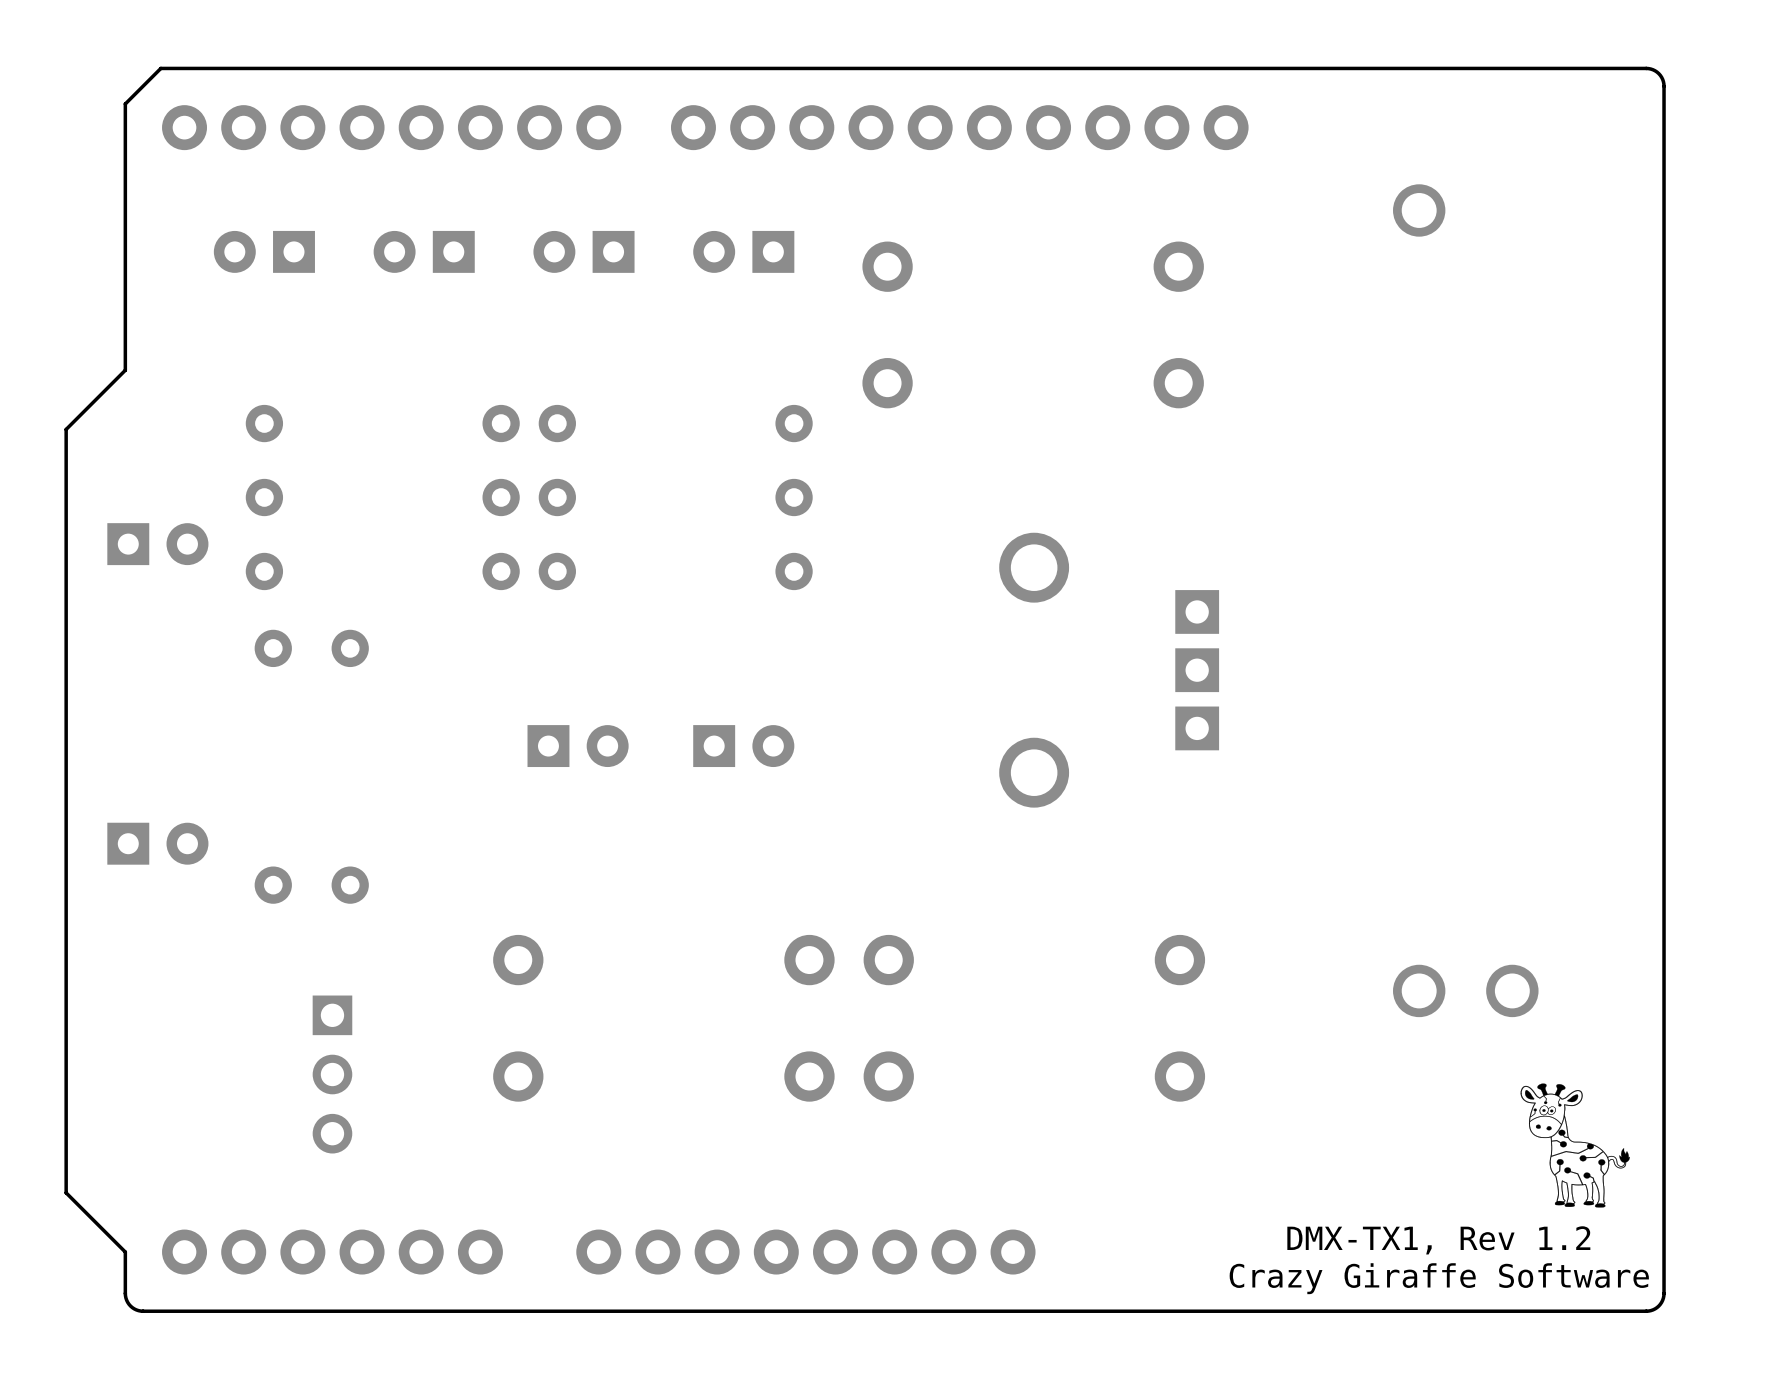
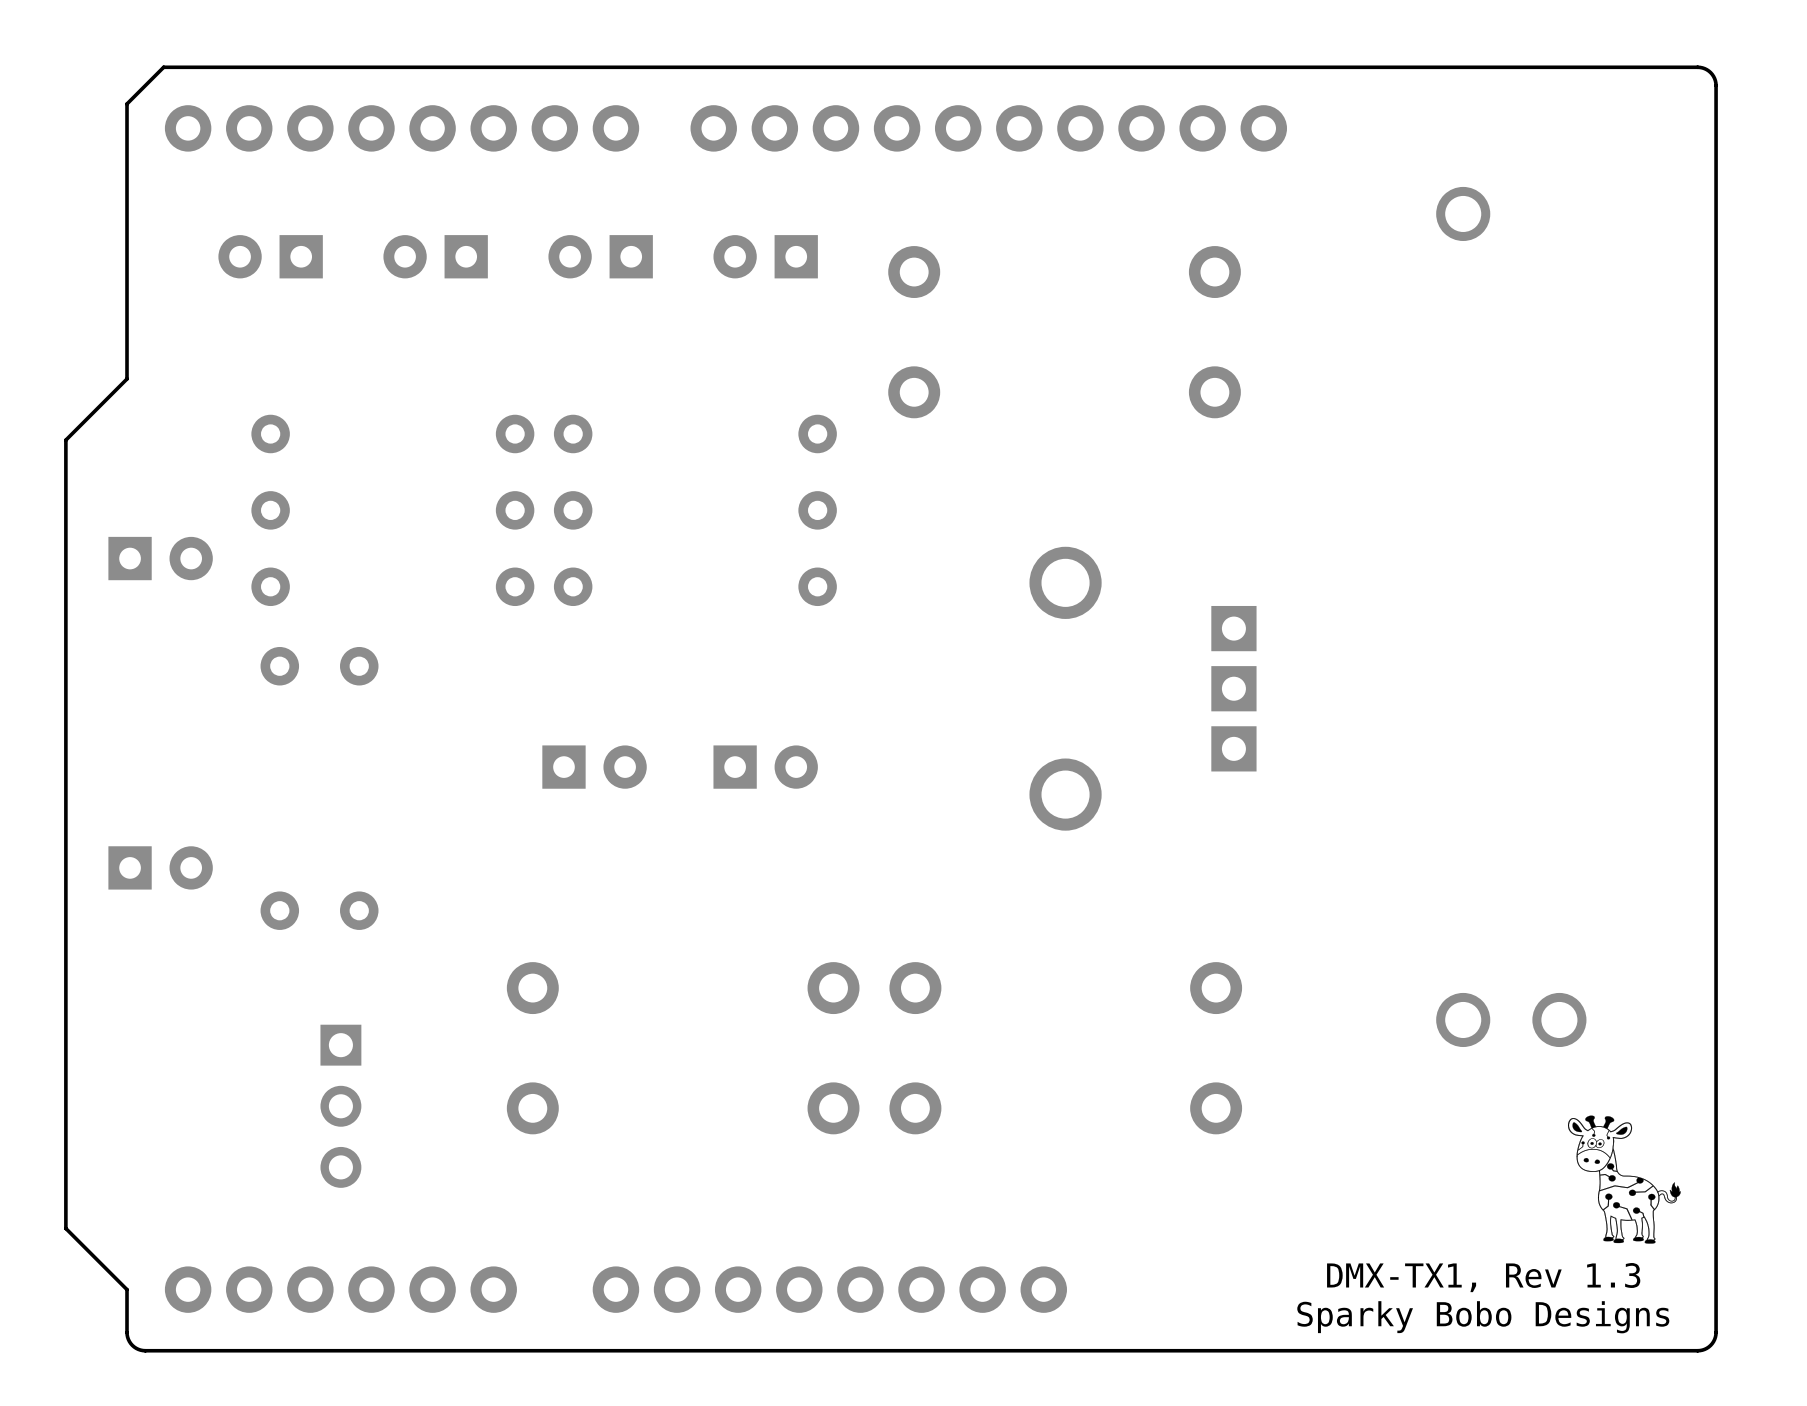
text: DMX-TX1, Rev 1.2 (1438, 1240) -> DMX-TX1, Rev 1.3 (1483, 1277)
text: Crazy Giraffe Software (1439, 1278) -> Sparky Bobo Designs (1483, 1317)

